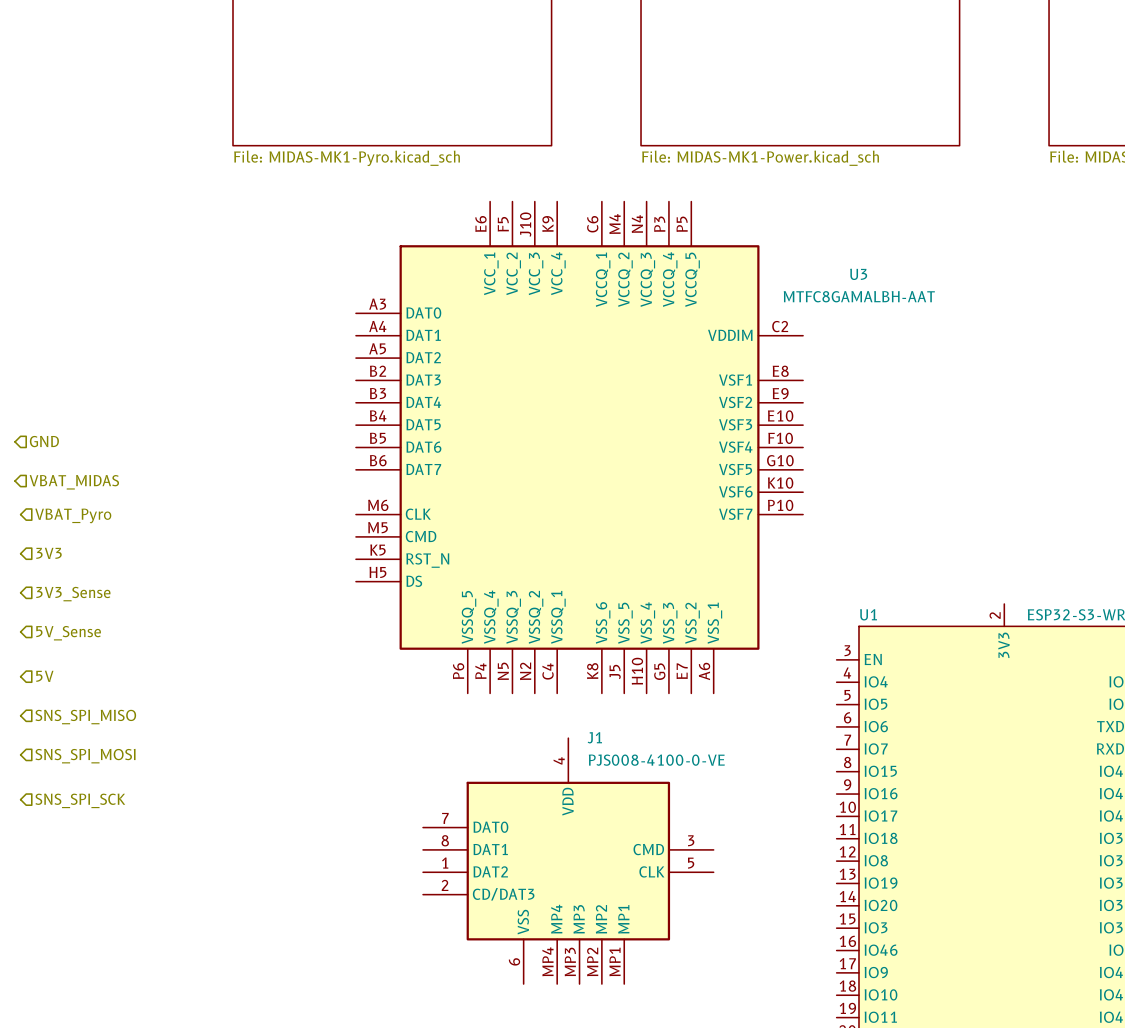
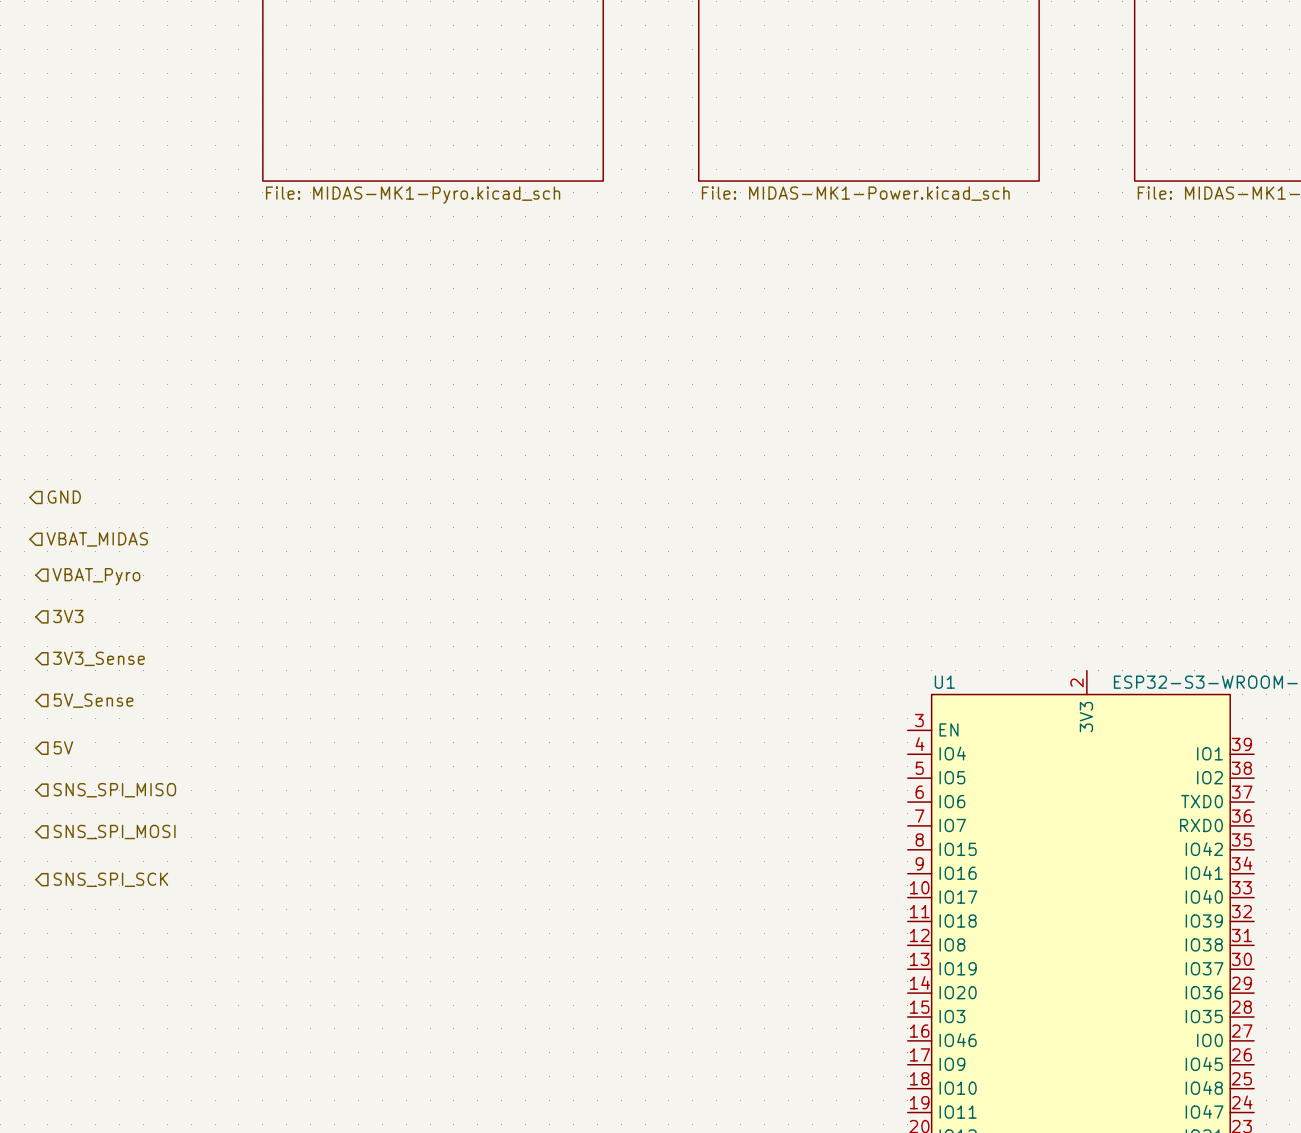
U3: MTFC8GAMALBH-AAT (579, 447) -> none
J1: PJS008-4100-0-VE (568, 861) -> none

